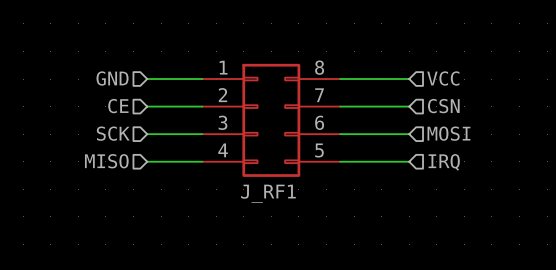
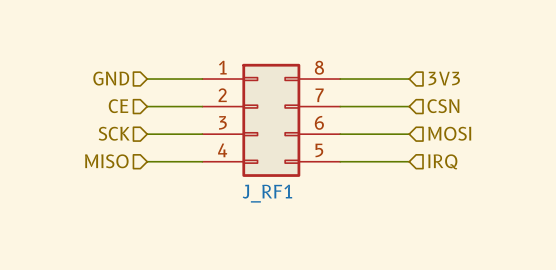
hierarchical label: VCC (443, 78) -> 3V3 (444, 78)

